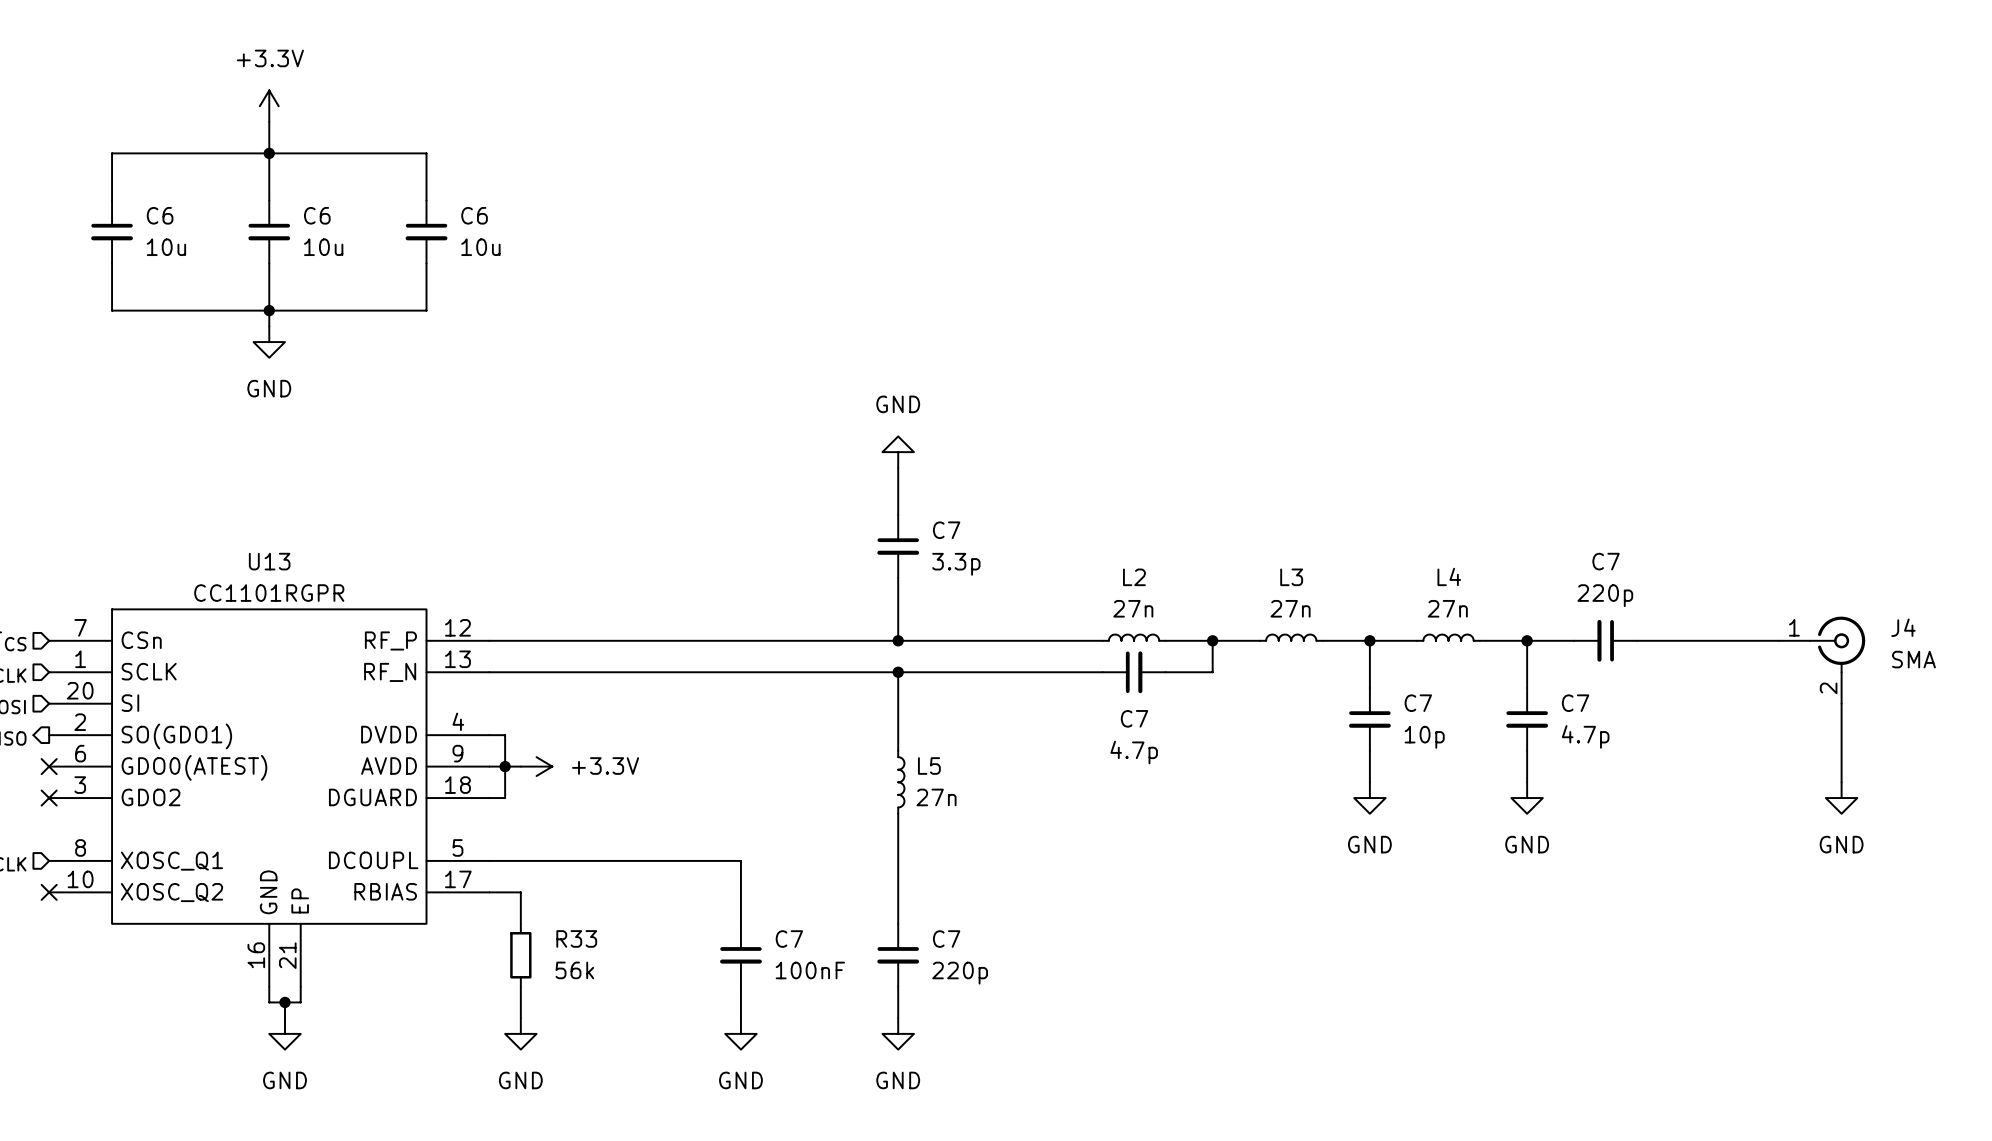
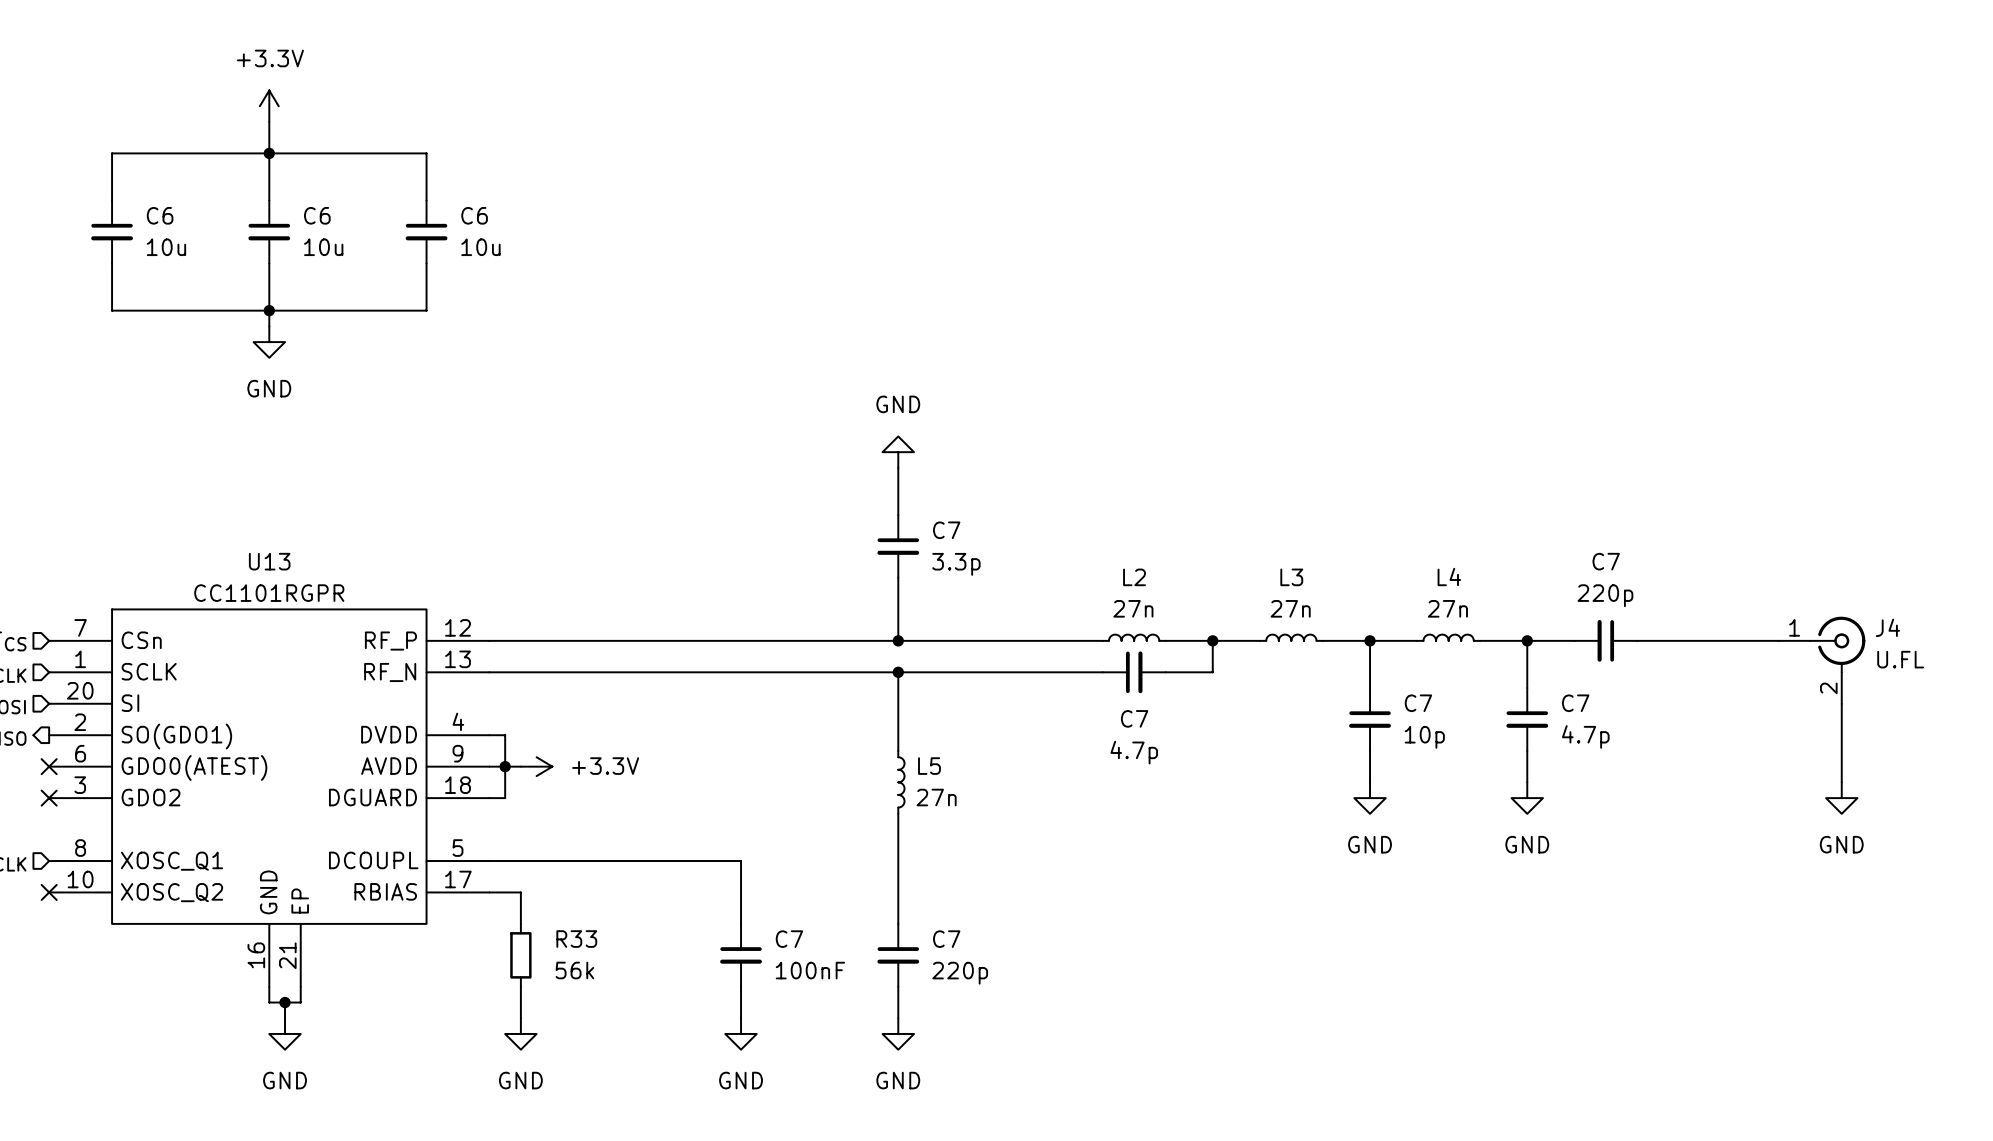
J4 name position: J4 (1903, 627) -> J4 (1887, 627)
J4 value: SMA (1913, 659) -> U.FL (1900, 659)

